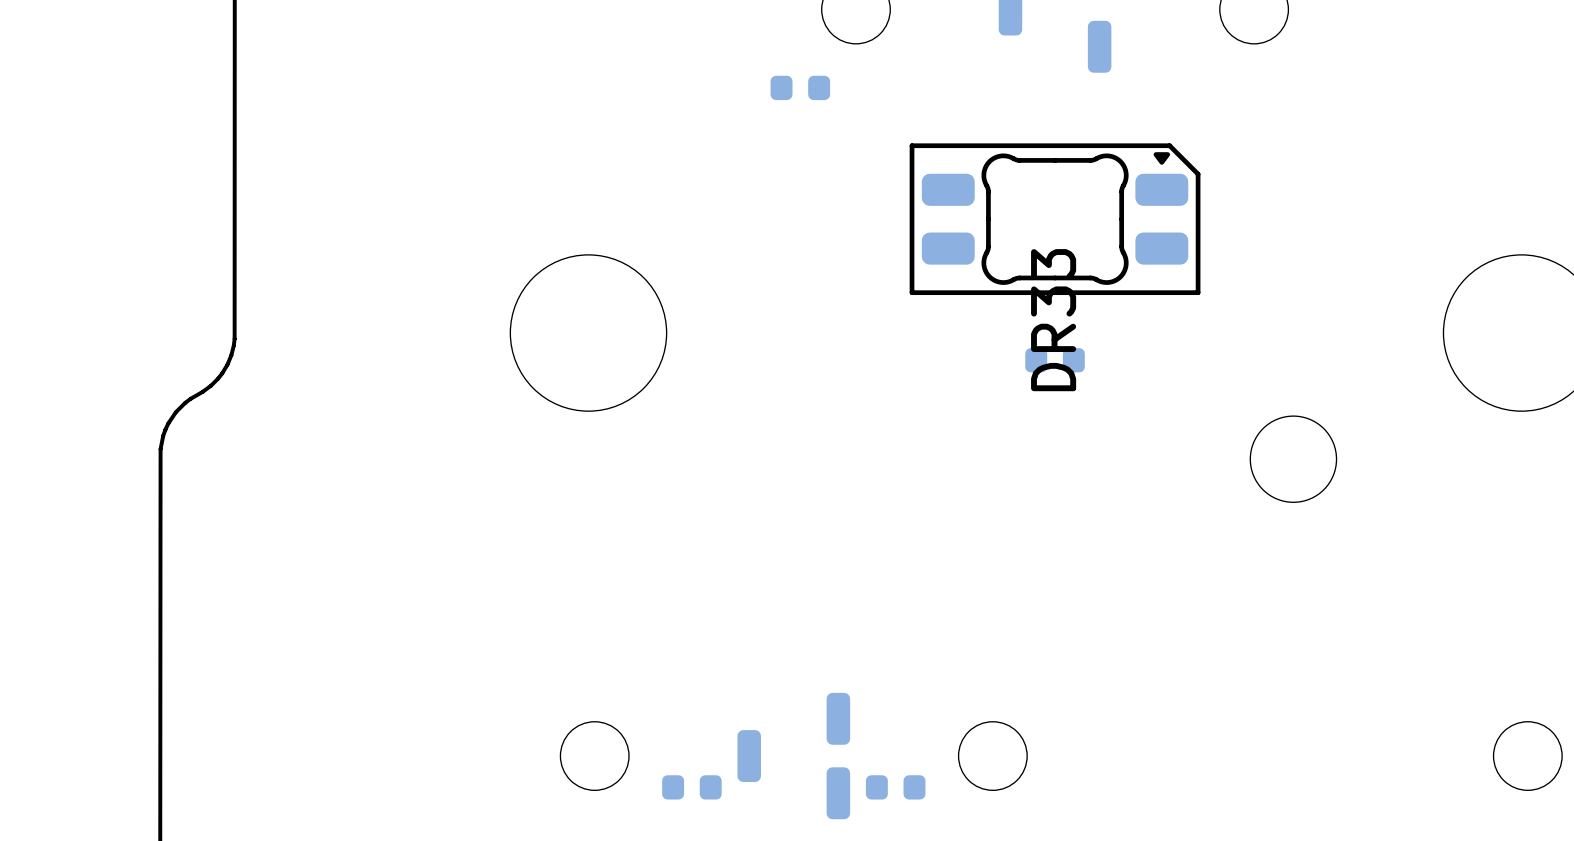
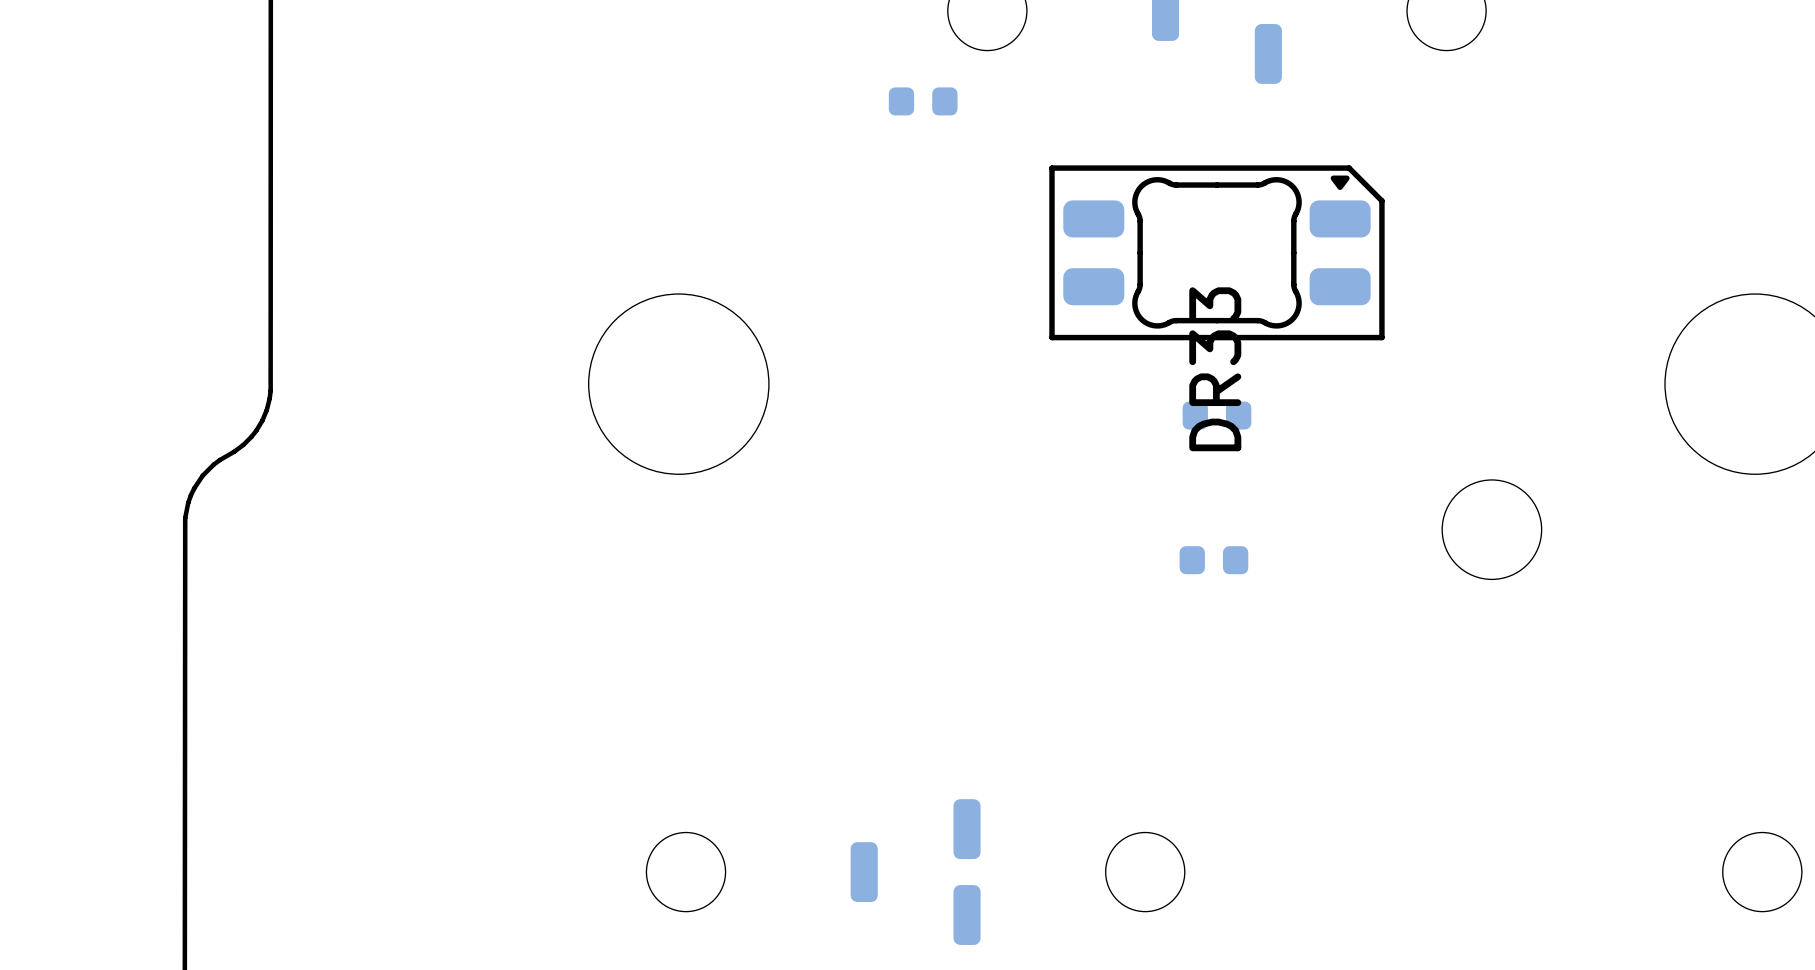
part: none -> (1213, 560)
part: (691, 787) -> none
part: (895, 787) -> none

